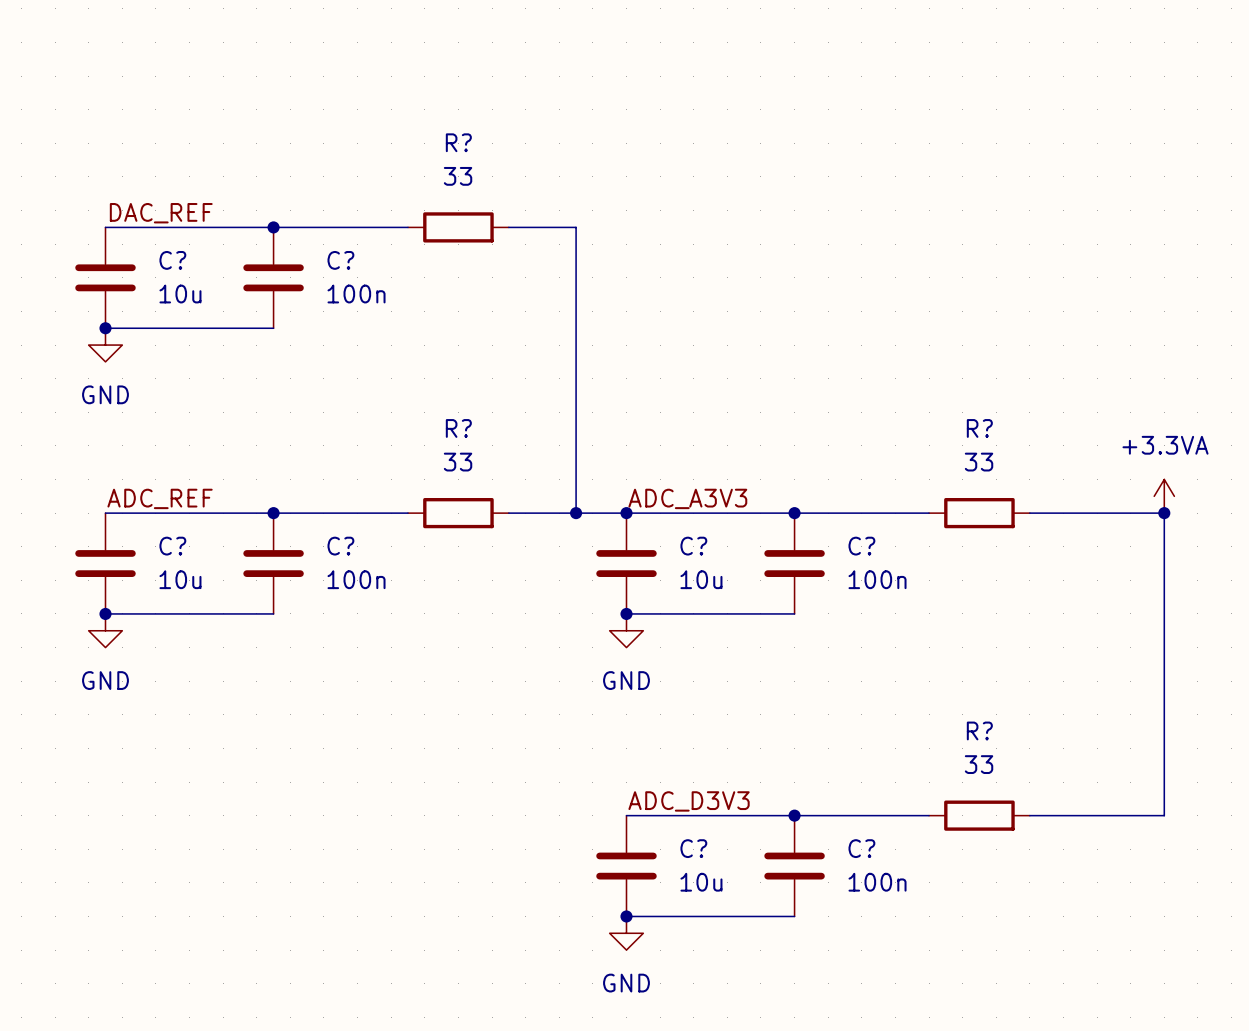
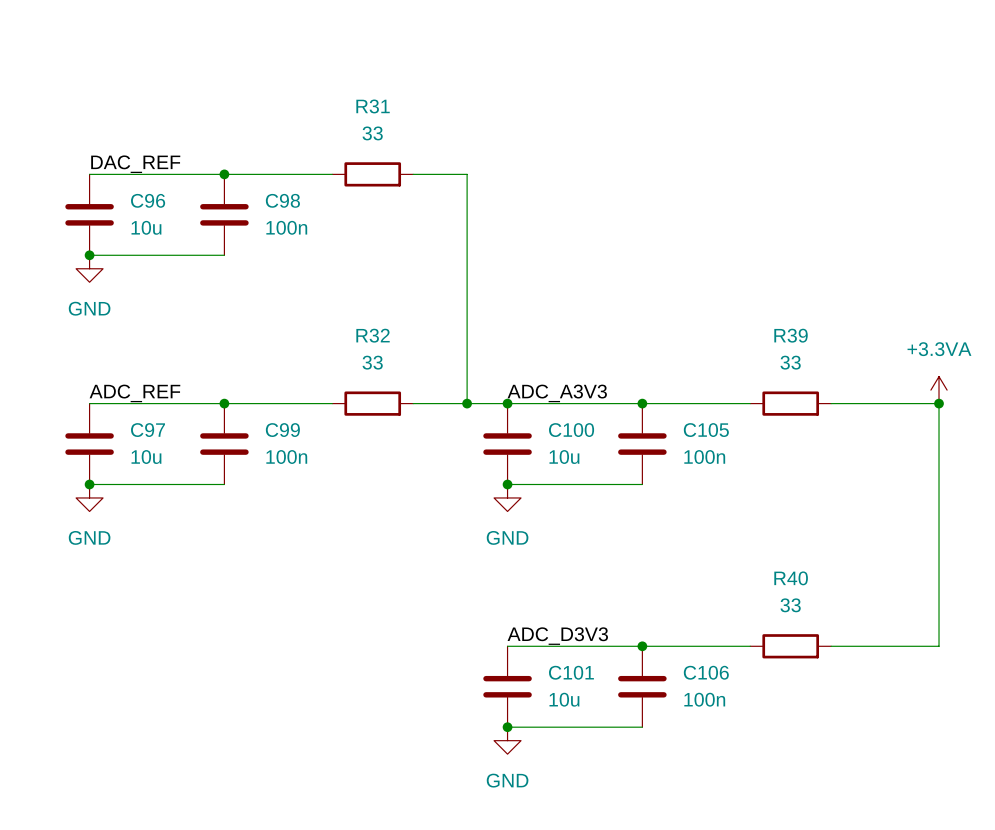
R? name: R? (458, 142) -> R31 (373, 106)
C? name: C? (172, 260) -> C96 (148, 200)
C? name: C? (340, 260) -> C98 (282, 200)
R? name: R? (458, 428) -> R32 (373, 335)
R? name: R? (979, 428) -> R39 (791, 335)
C? name: C? (172, 546) -> C97 (148, 430)
C? name: C? (340, 546) -> C99 (282, 430)
C? name: C? (693, 546) -> C100 (571, 430)
C? name: C? (861, 546) -> C105 (706, 430)
R? name: R? (979, 730) -> R40 (791, 578)
C? name: C? (693, 848) -> C101 (571, 672)
C? name: C? (861, 848) -> C106 (706, 672)

